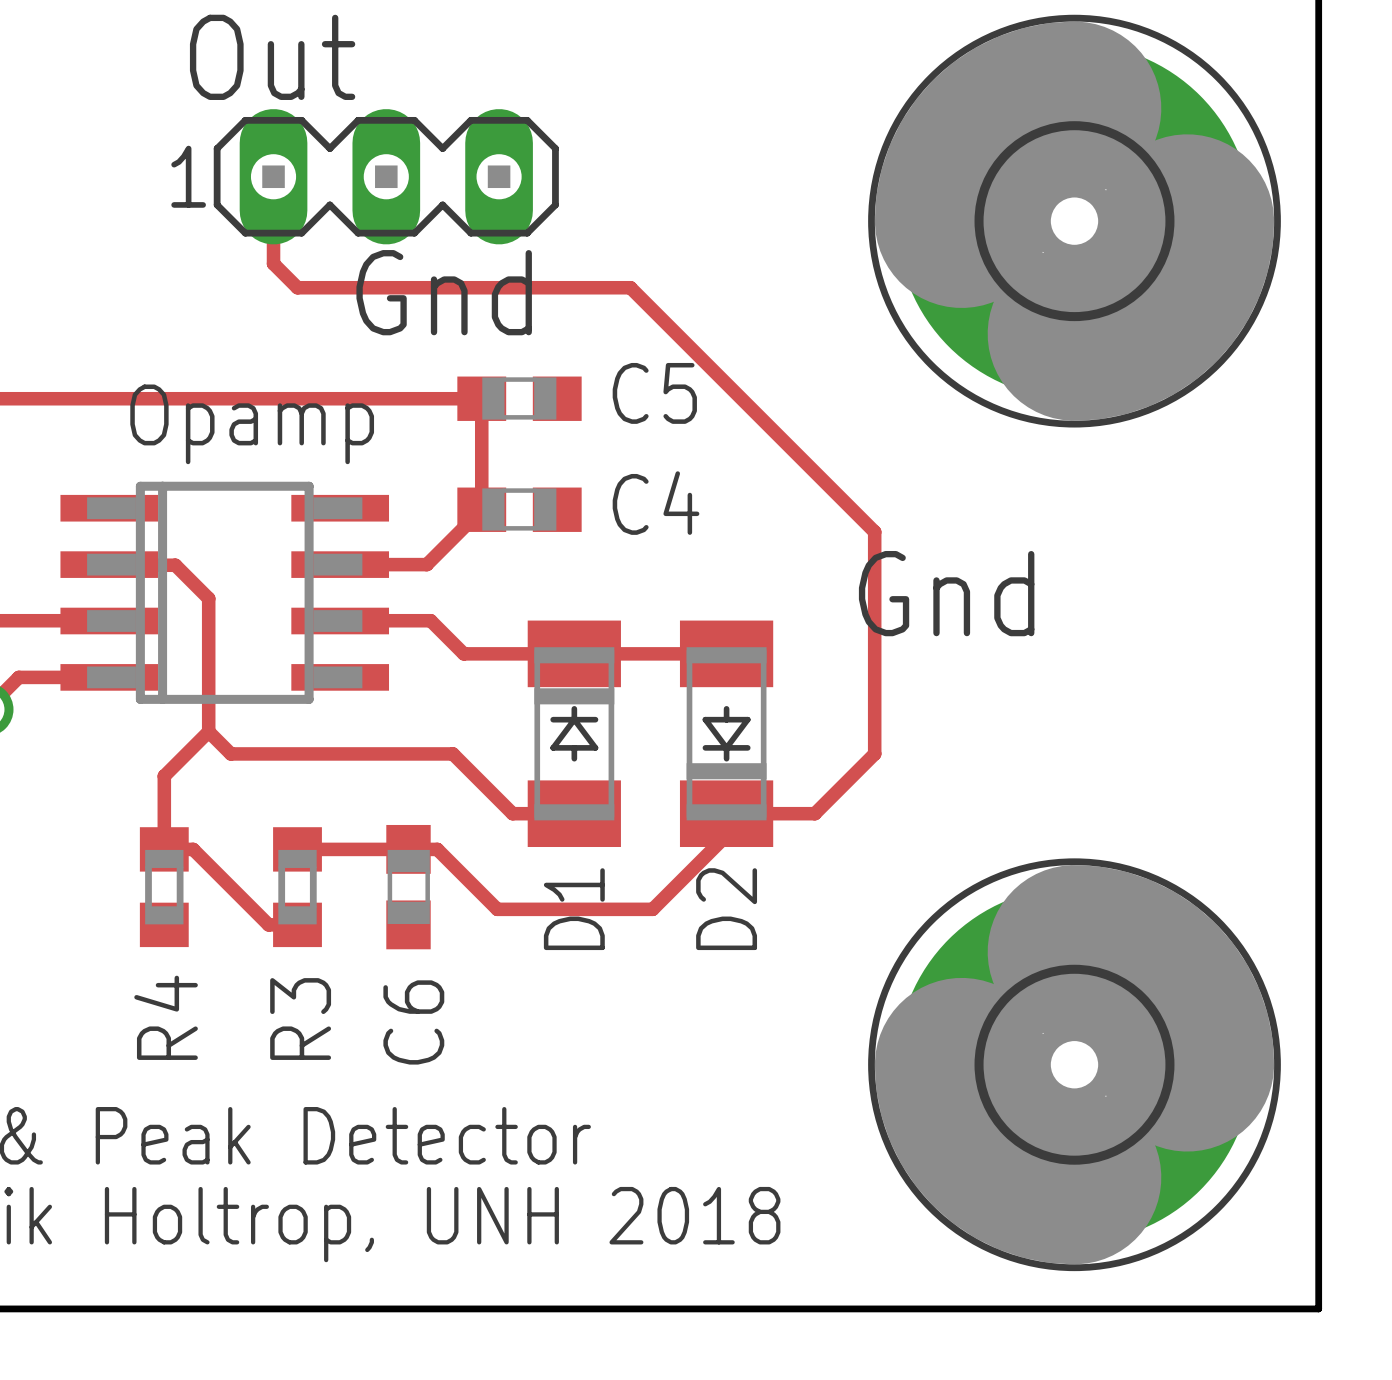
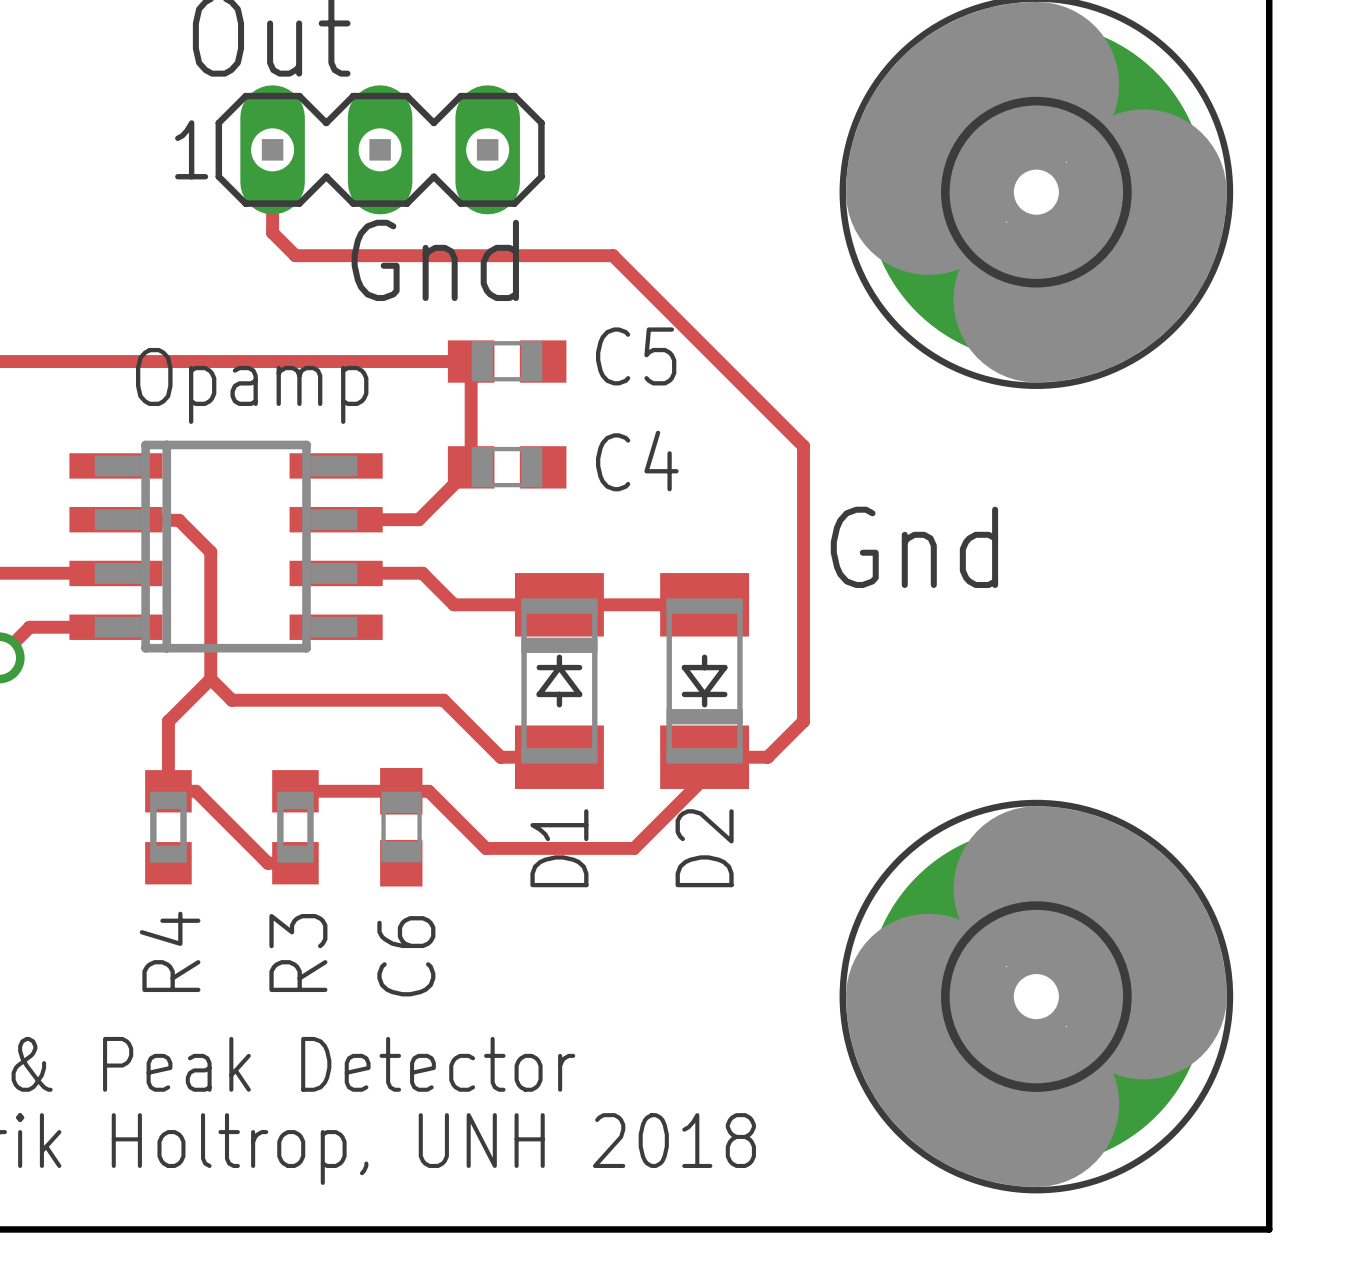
track: (830, 487) (874, 531) (874, 753) (814, 813) (792, 813) -> (803, 446) (803, 721) (767, 757)

